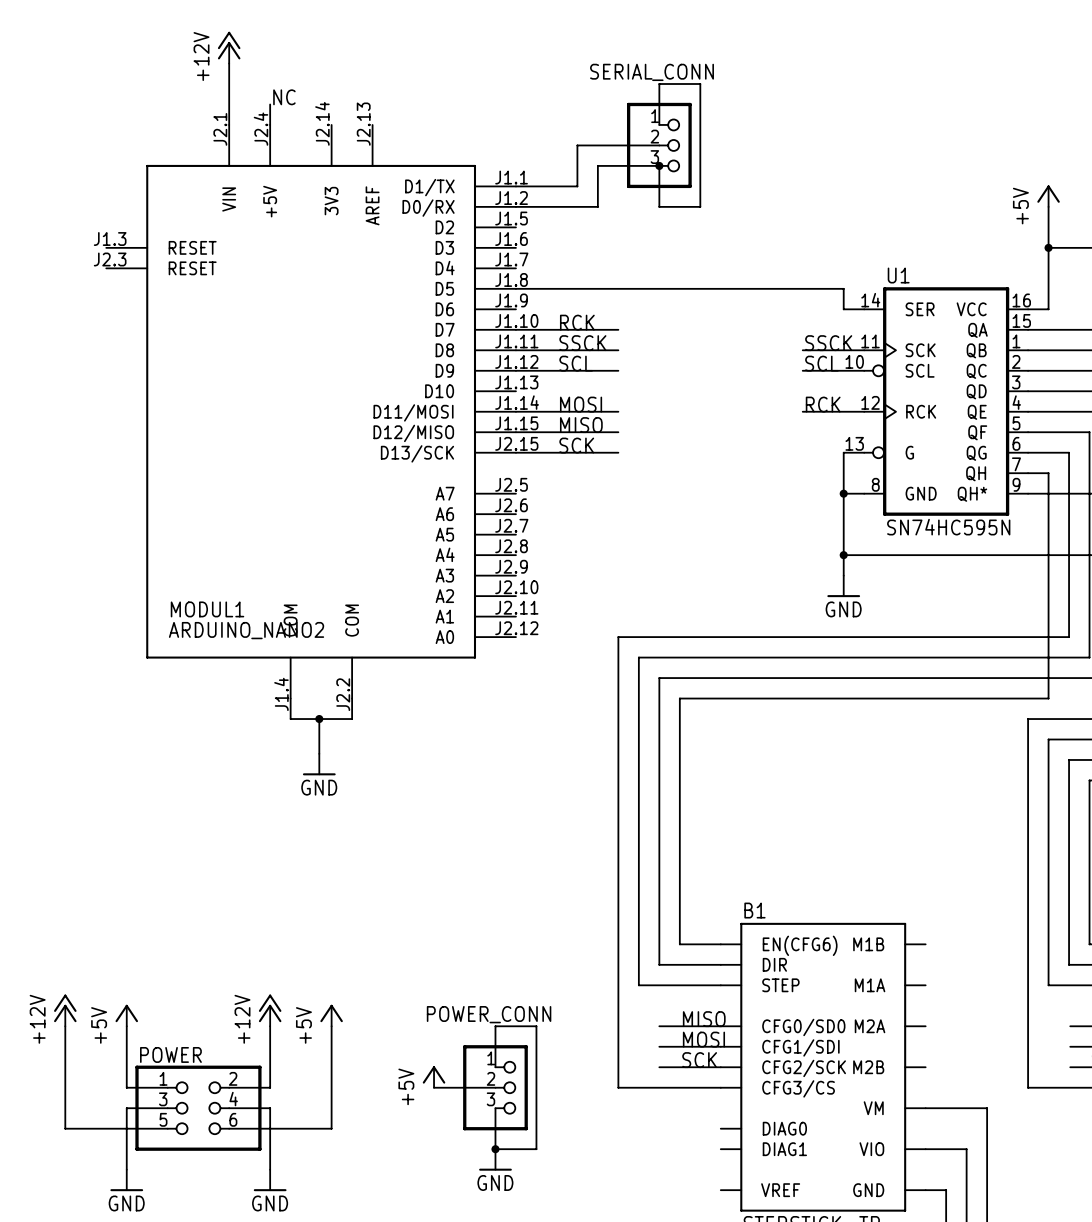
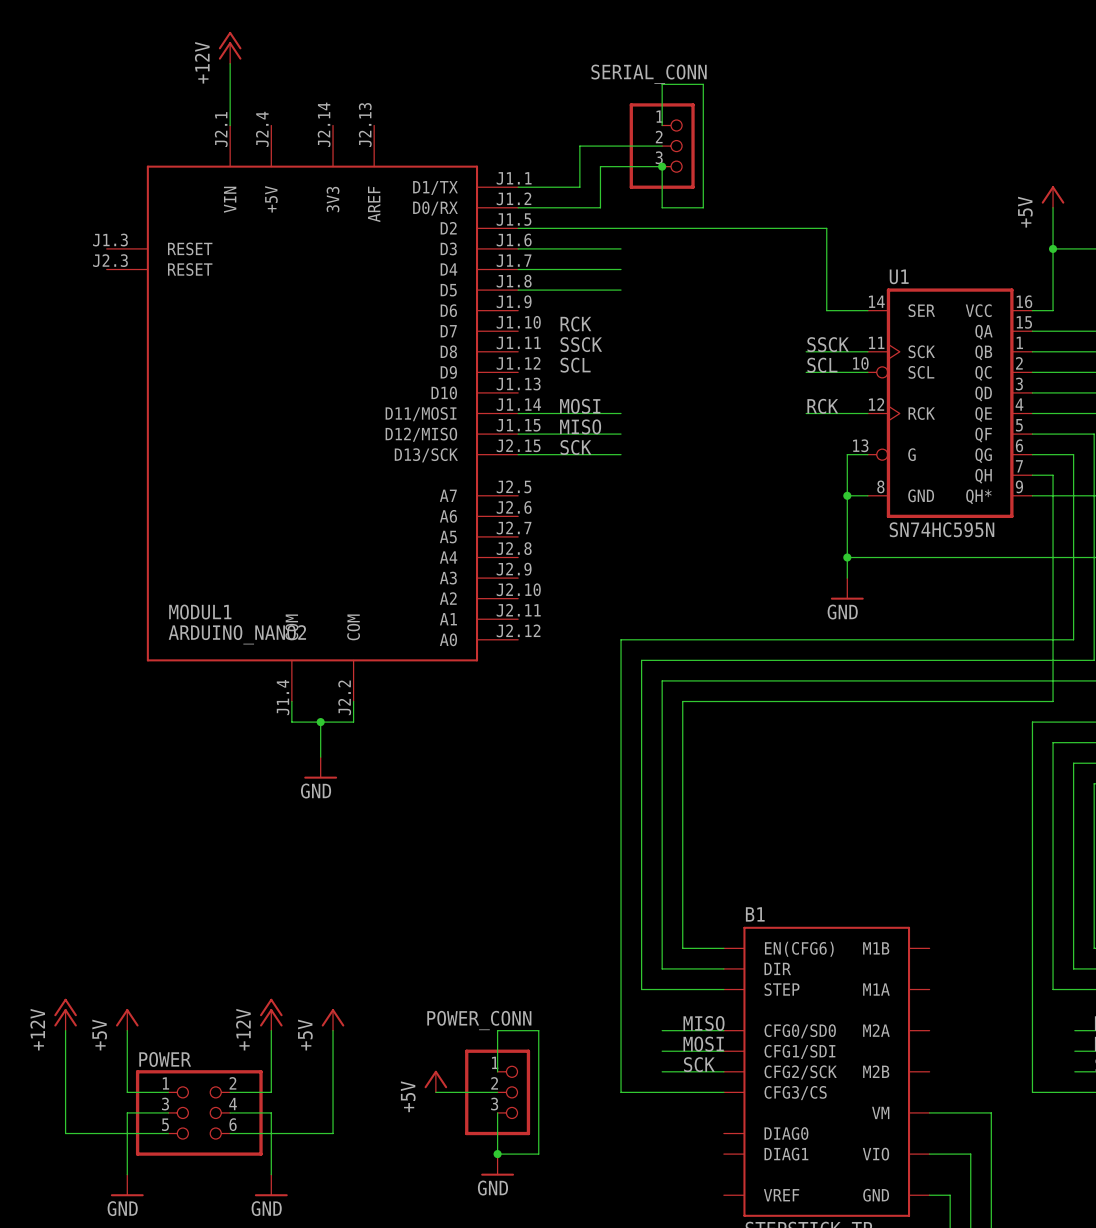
label: NC (284, 97) -> none
wire: (270, 104) (270, 124) -> none
wire: (618, 288) (843, 288) (843, 309) -> (518, 228) (826, 228) (826, 310) (847, 310)
wire: (515, 329) (618, 329) -> (518, 248) (621, 248)
wire: (515, 350) (618, 350) -> (518, 269) (621, 269)
wire: (515, 370) (618, 370) -> none

